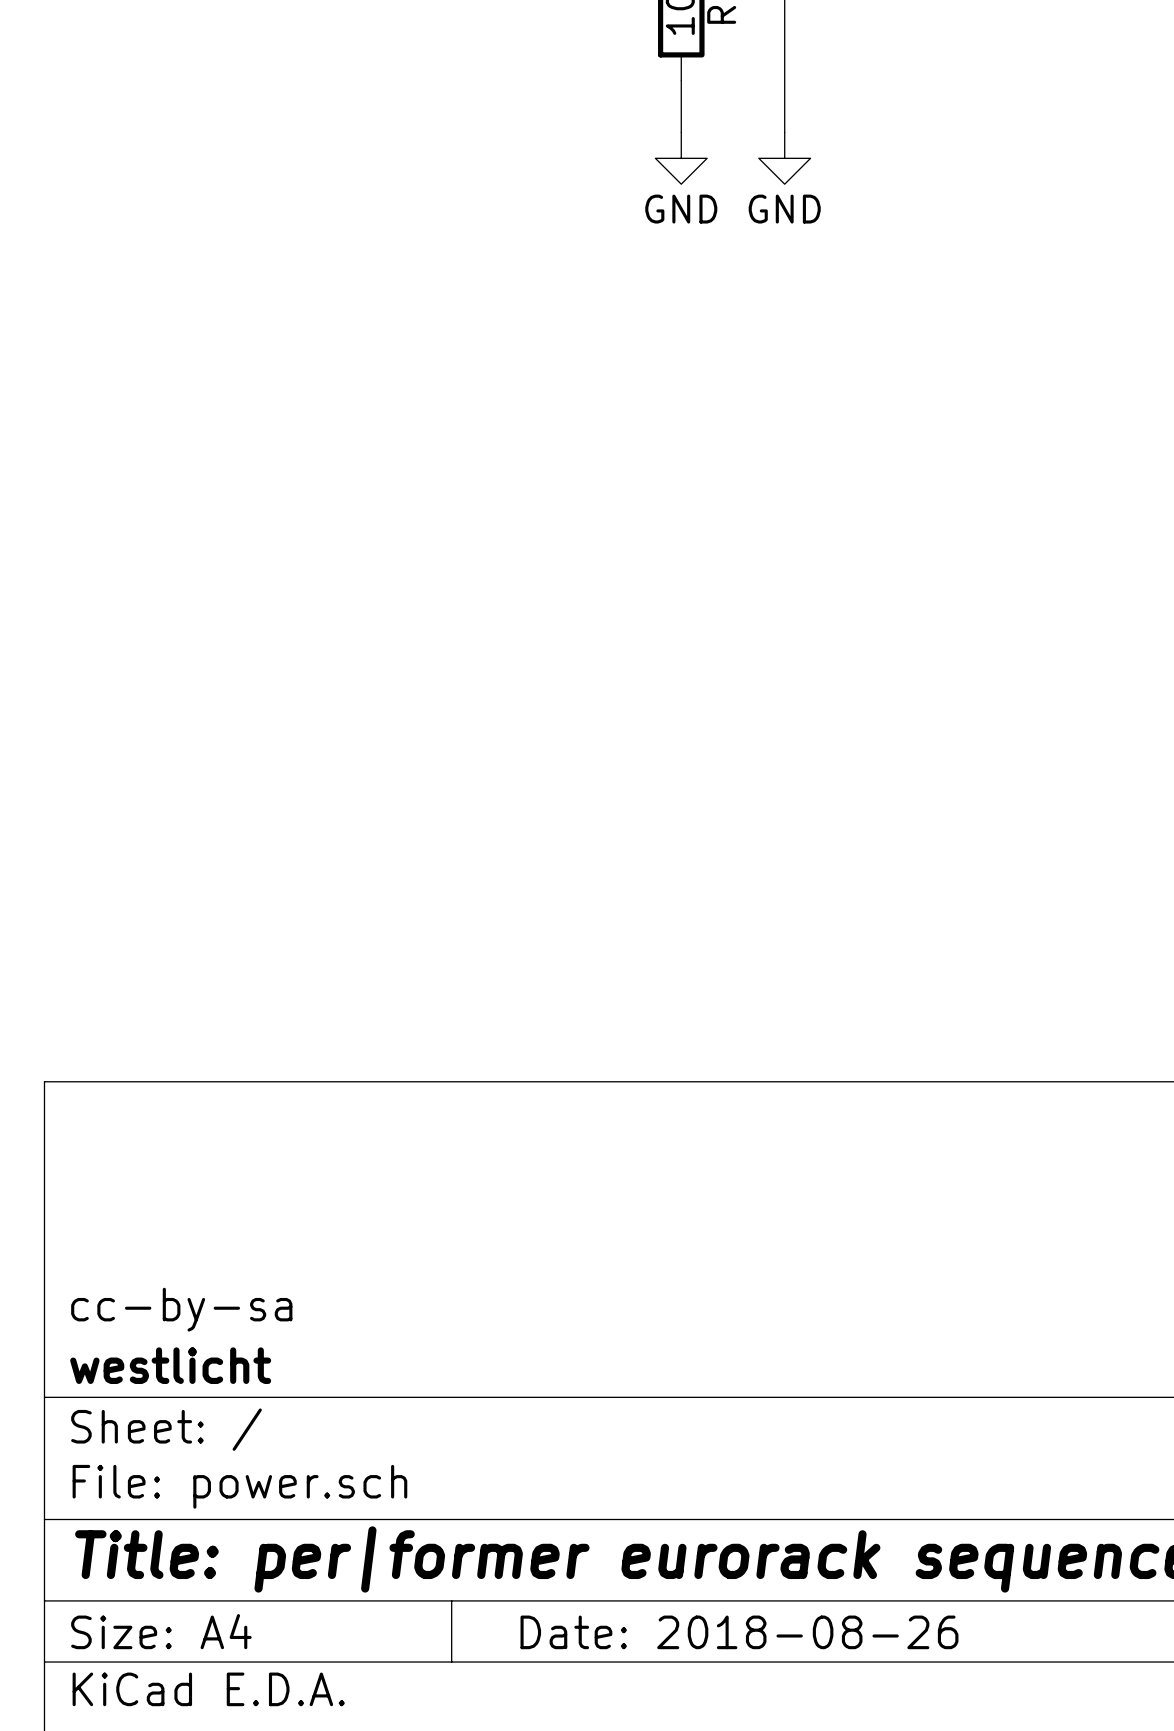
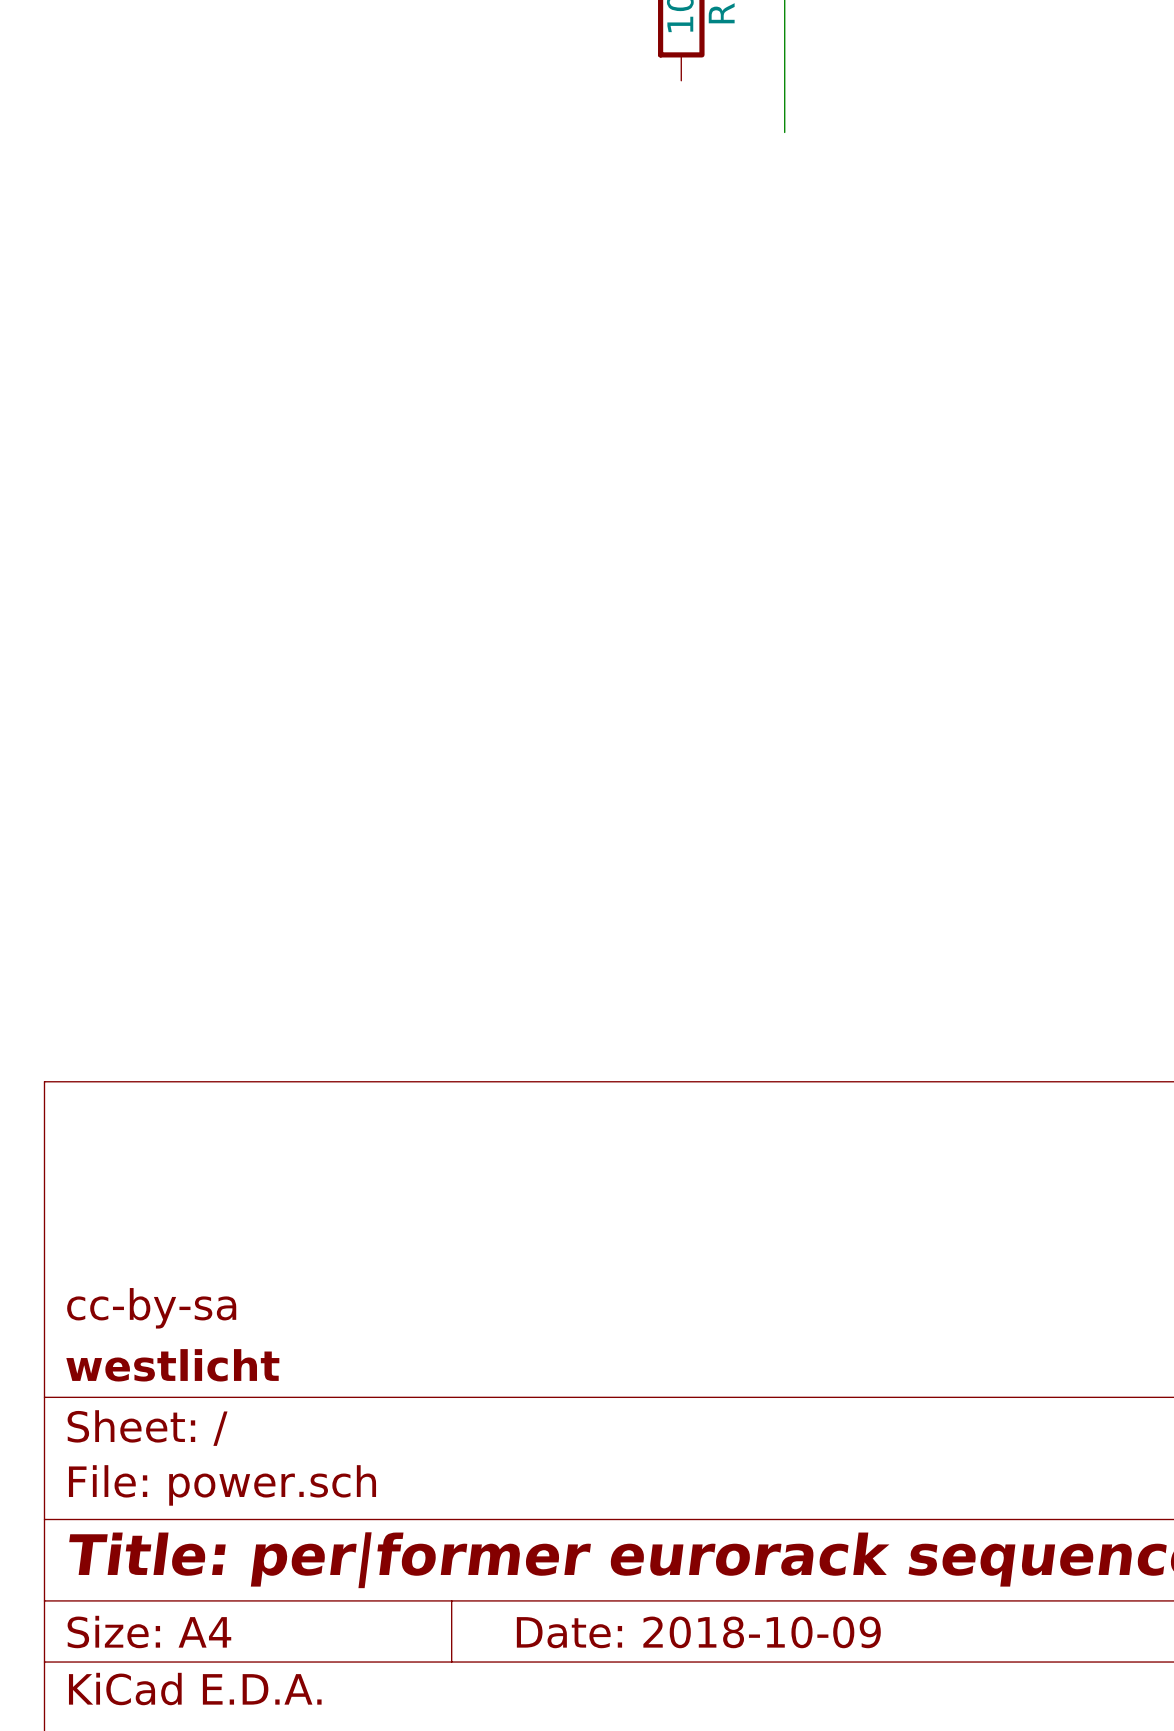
wire: (681, 80) (681, 132) -> none
power symbol: GND (681, 158) -> none
power symbol: GND (784, 158) -> none
title block: Date: 2018-08-26 (739, 1632) -> Date: 2018-10-09 (698, 1632)

